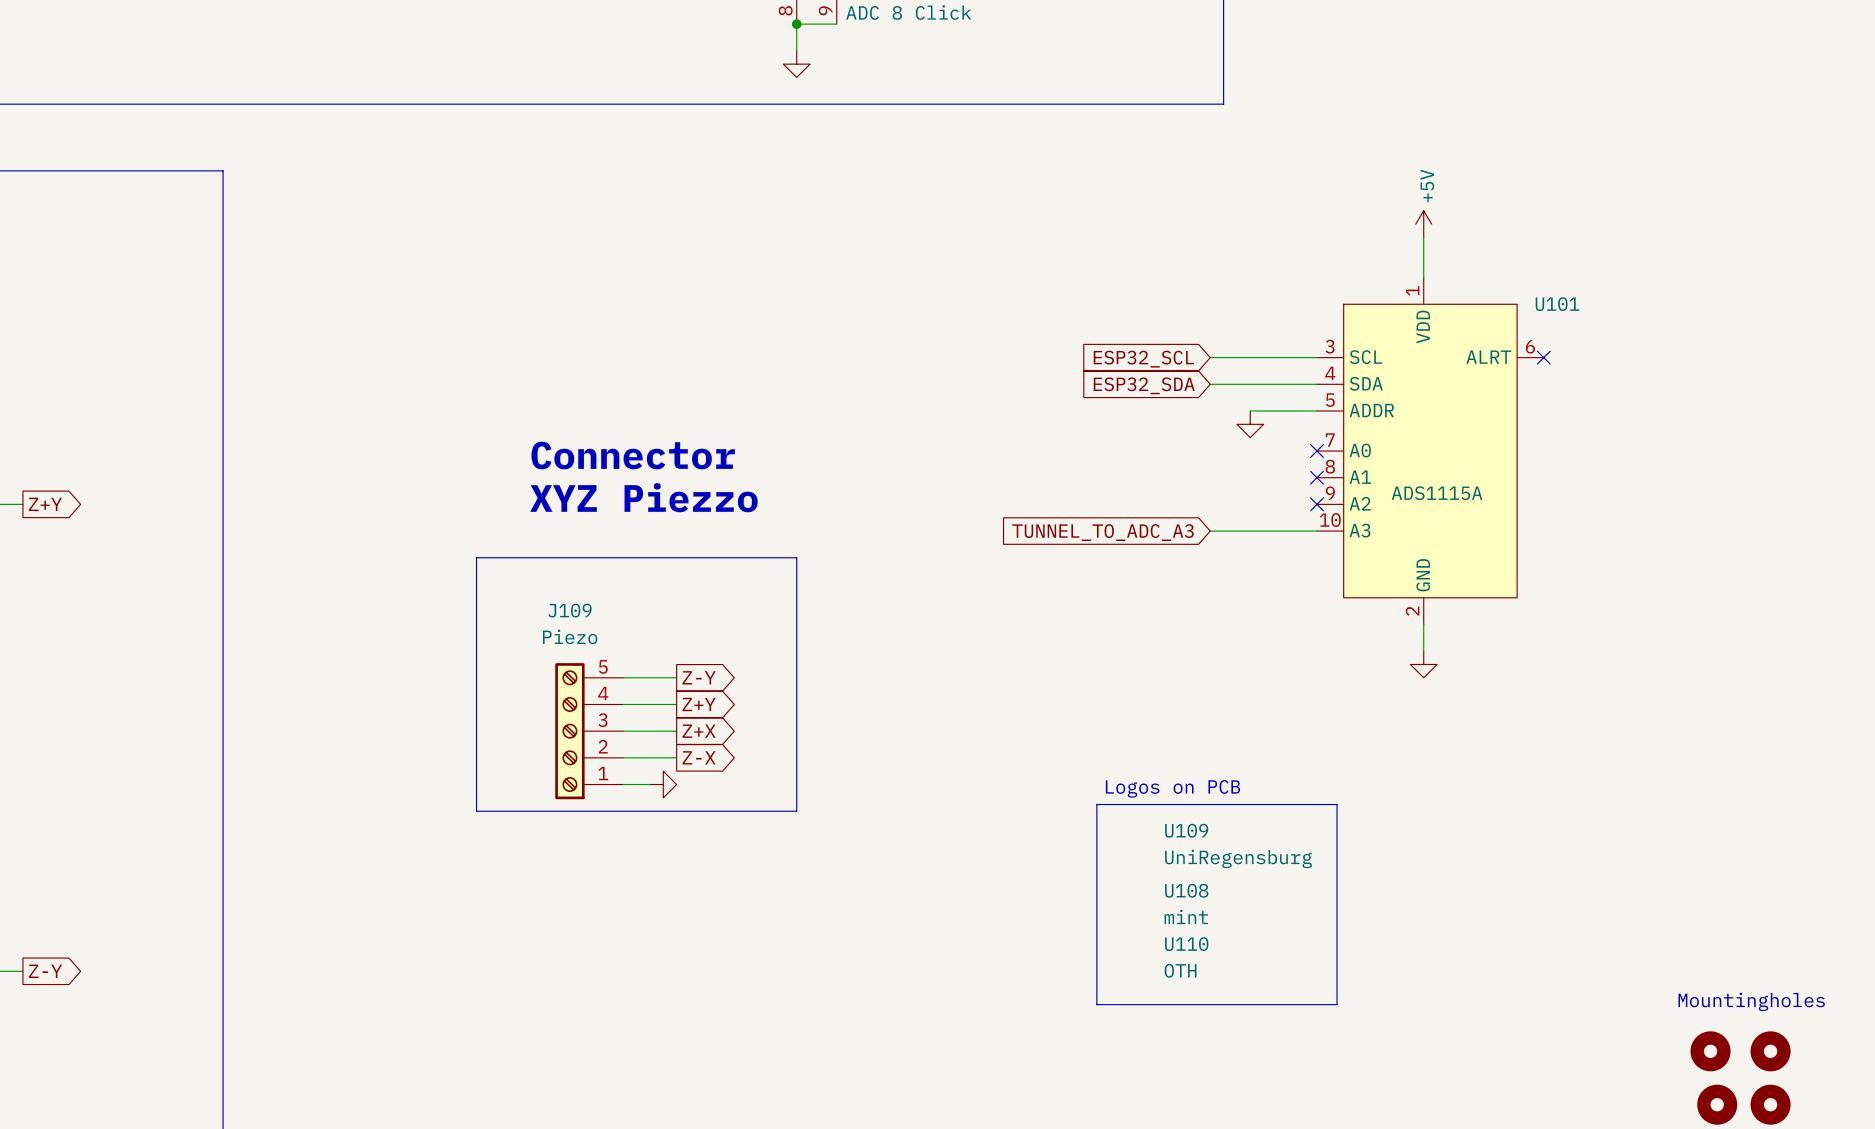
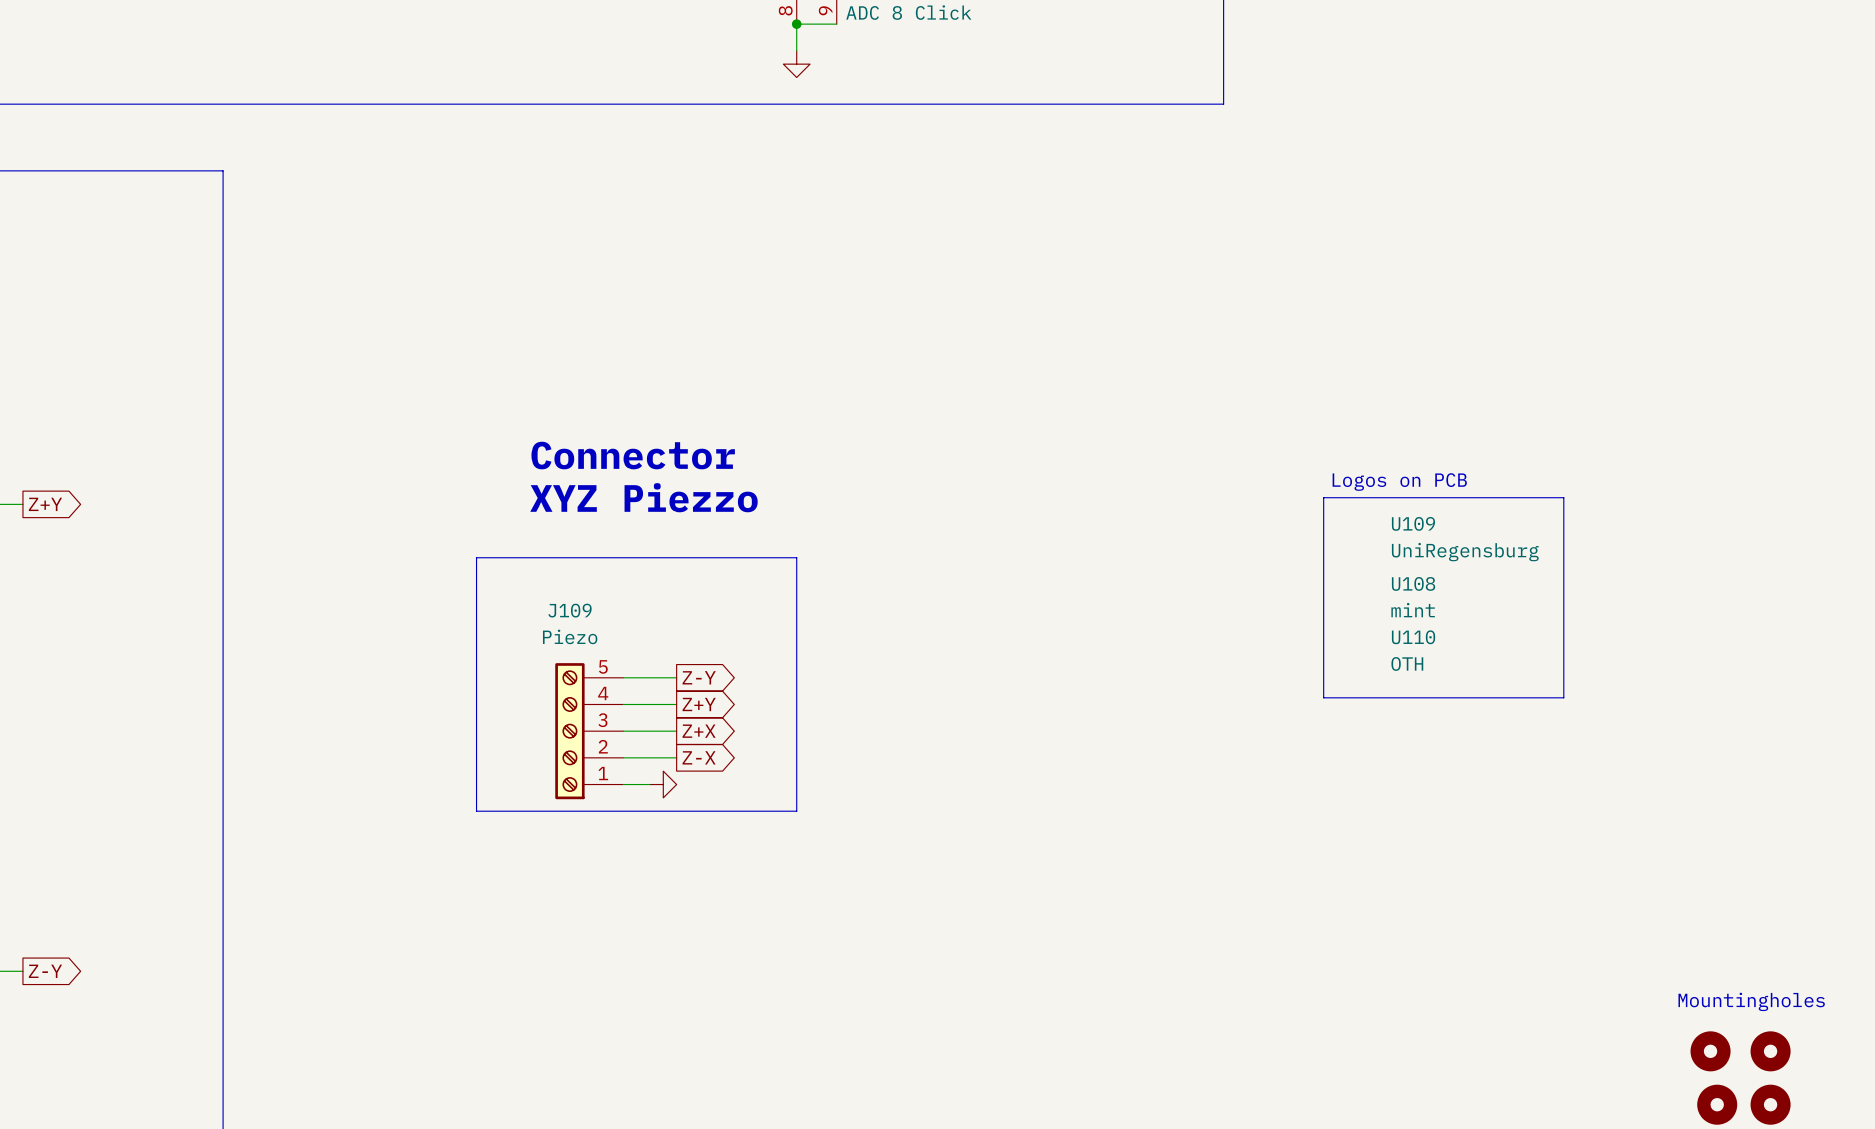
power symbol: +5V (1423, 224) -> none
wire: (1423, 237) (1423, 277) -> none
wire: (1210, 357) (1316, 357) -> none
no-connect mark: (1543, 357) -> none
global label: ESP32_SCL (1143, 359) -> none
wire: (1210, 384) (1316, 384) -> none
global label: ESP32_SDA (1144, 385) -> none
wire: (1250, 410) (1316, 410) -> none
power symbol: (1250, 424) -> none
no-connect mark: (1316, 451) -> none
U101: ADS1115A (1430, 451) -> none
no-connect mark: (1316, 477) -> none
text: none -> Logos on PCB (1399, 482)
line: none -> (1323, 497) (1323, 697) (1563, 697) (1563, 497) (1323, 497)
no-connect mark: (1316, 504) -> none
wire: (1210, 531) (1316, 531) -> none
global label: TUNNEL_TO_ADC_A3 (1102, 532) -> none
wire: (1423, 624) (1423, 651) -> none
power symbol: (1423, 664) -> none
text: Logos on PCB (1172, 788) -> none
line: (1096, 804) (1096, 1004) (1337, 1004) (1337, 804) (1096, 804) -> none
U109 position: (1238, 845) -> (1465, 539)
U108 position: (1186, 903) -> (1413, 597)
U110 position: (1186, 957) -> (1413, 650)

